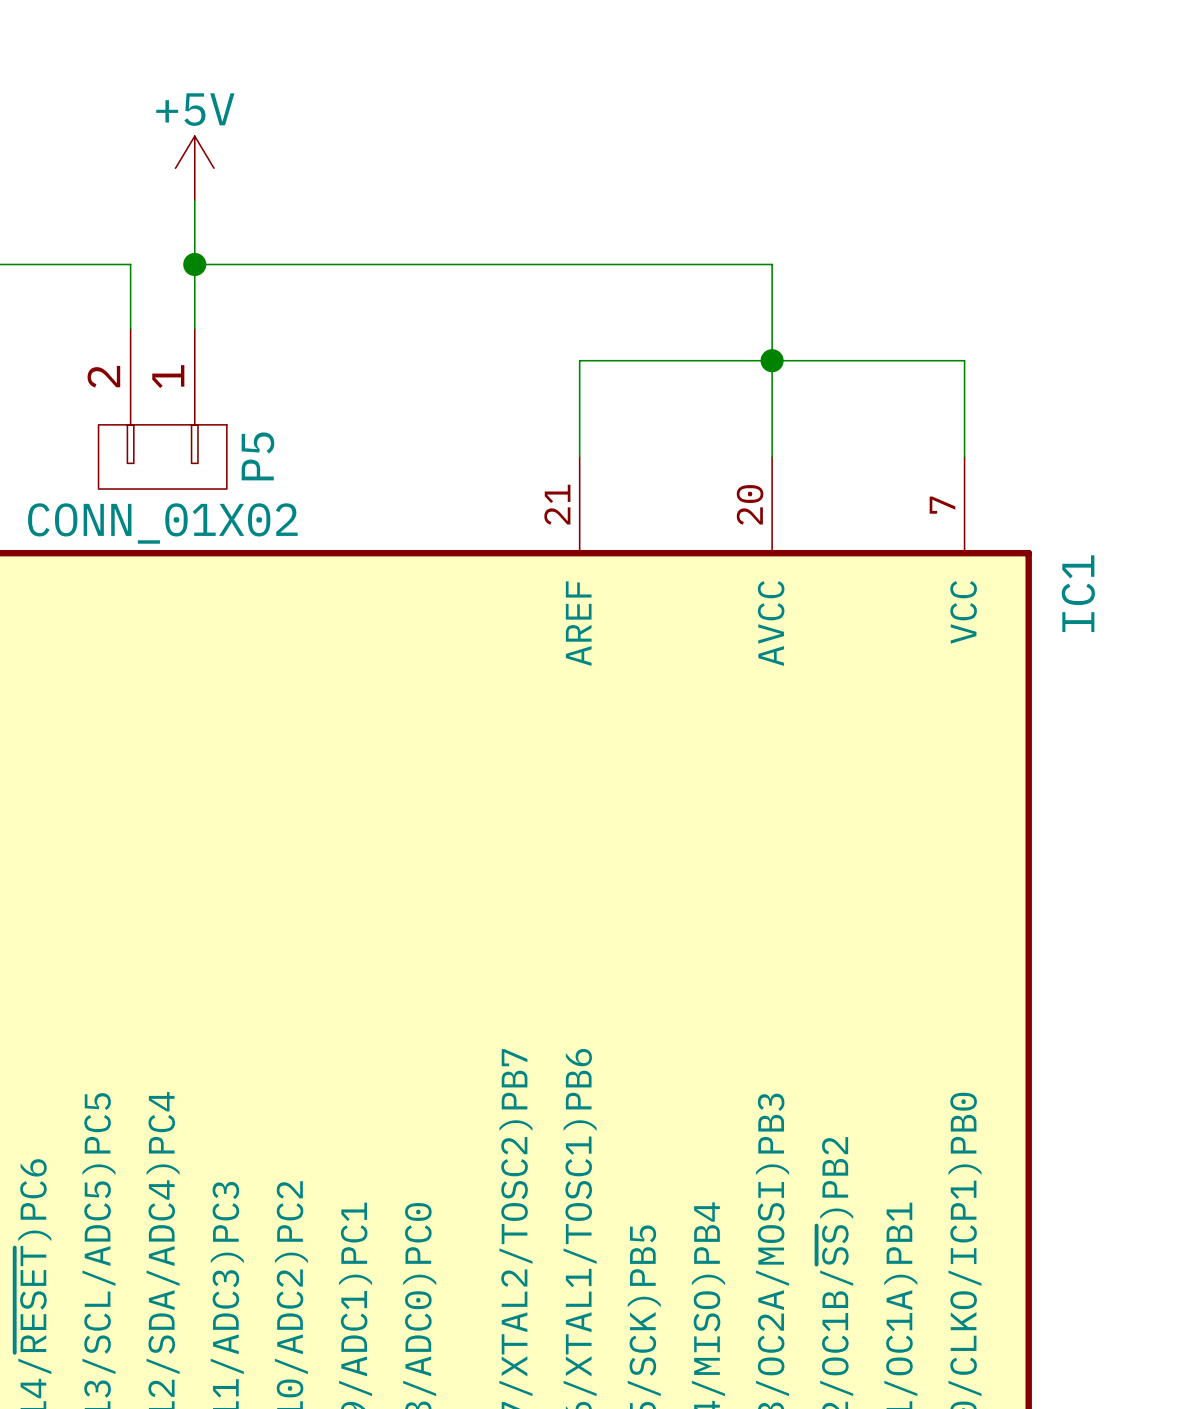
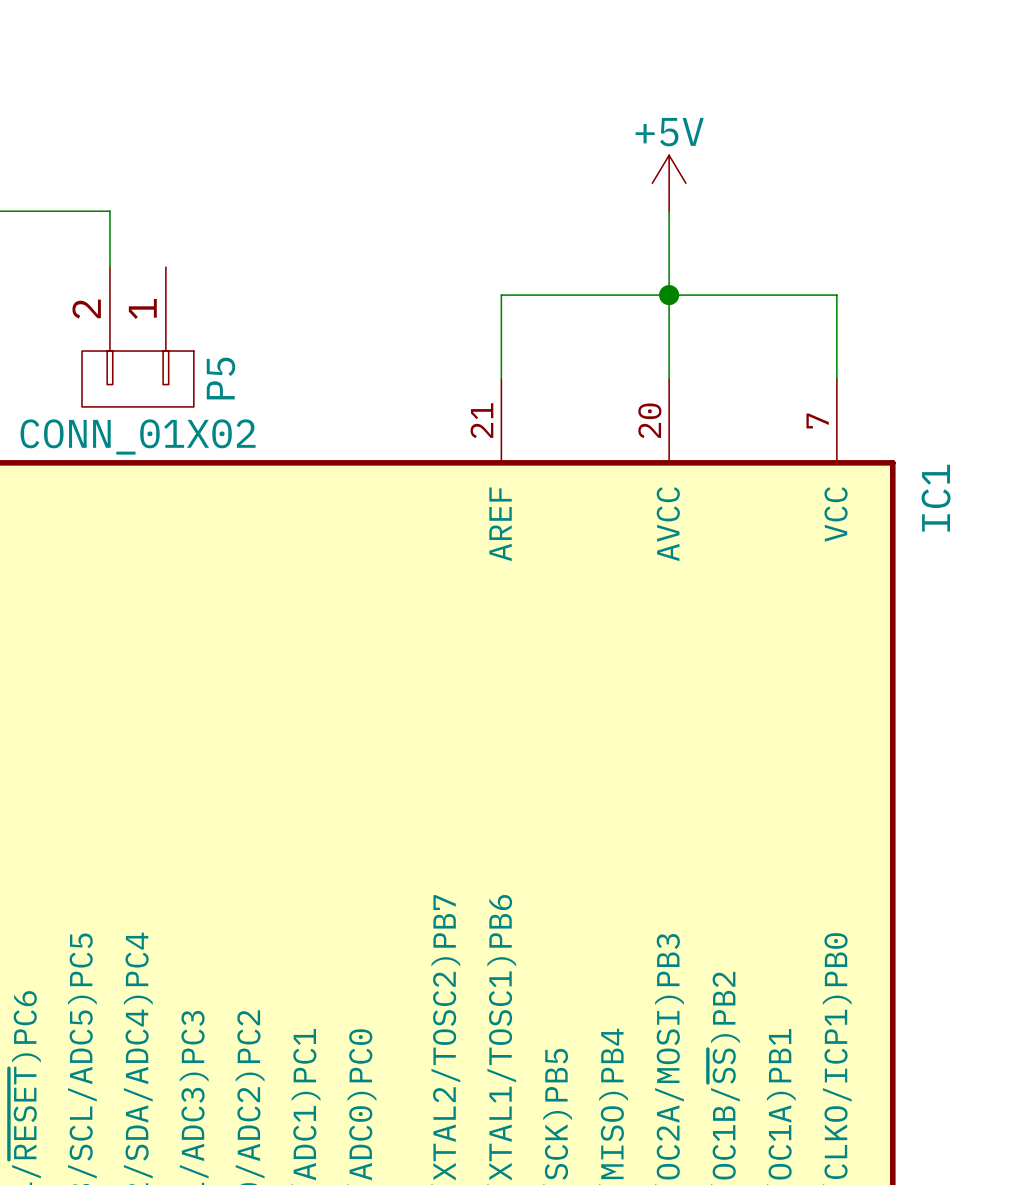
power symbol position: +5V (194, 168) -> +5V (669, 183)
wire: (194, 200) (194, 328) -> none
wire: (194, 264) (772, 264) -> none
junction: (194, 264) -> none

